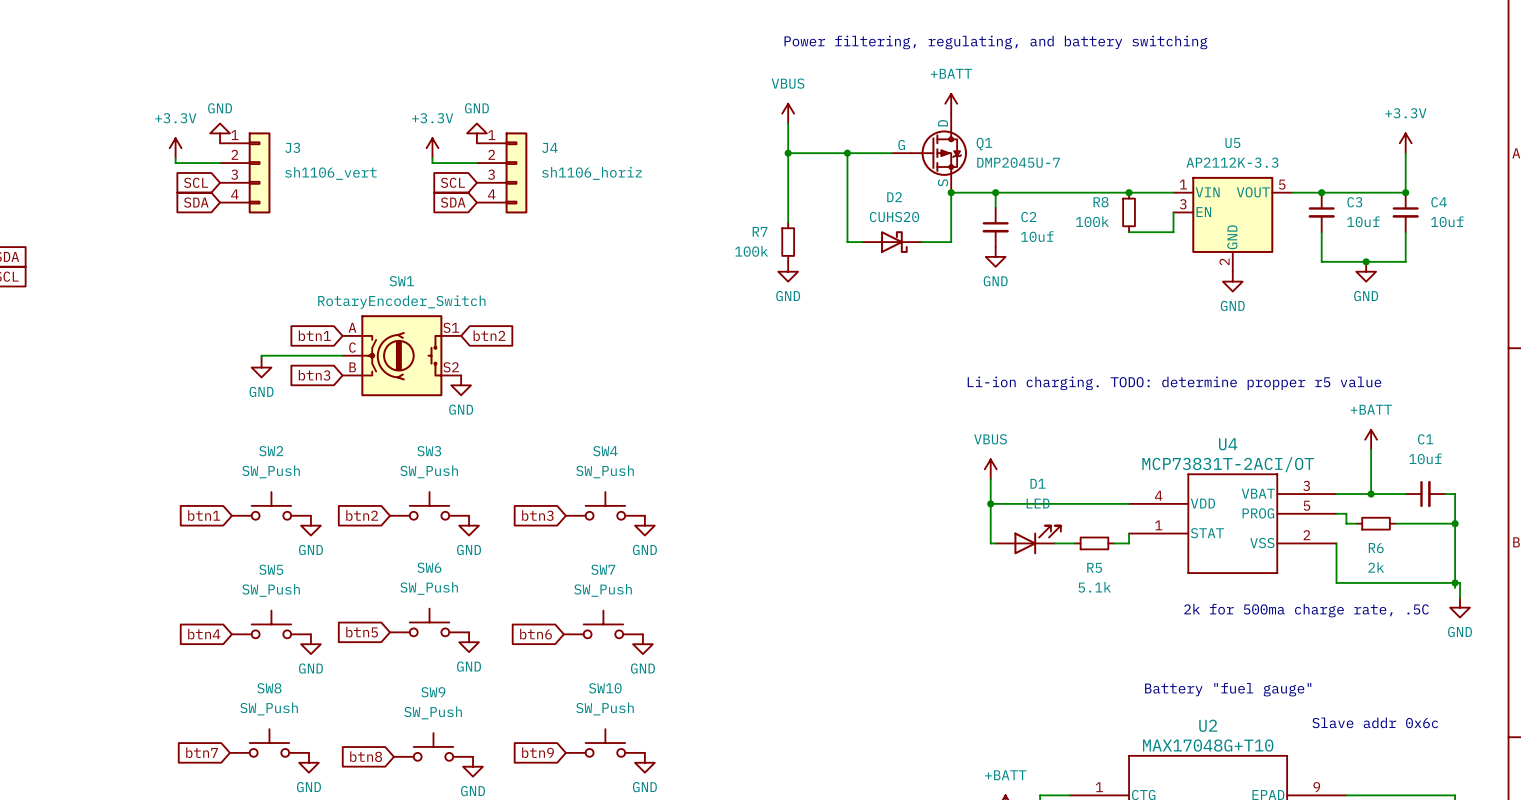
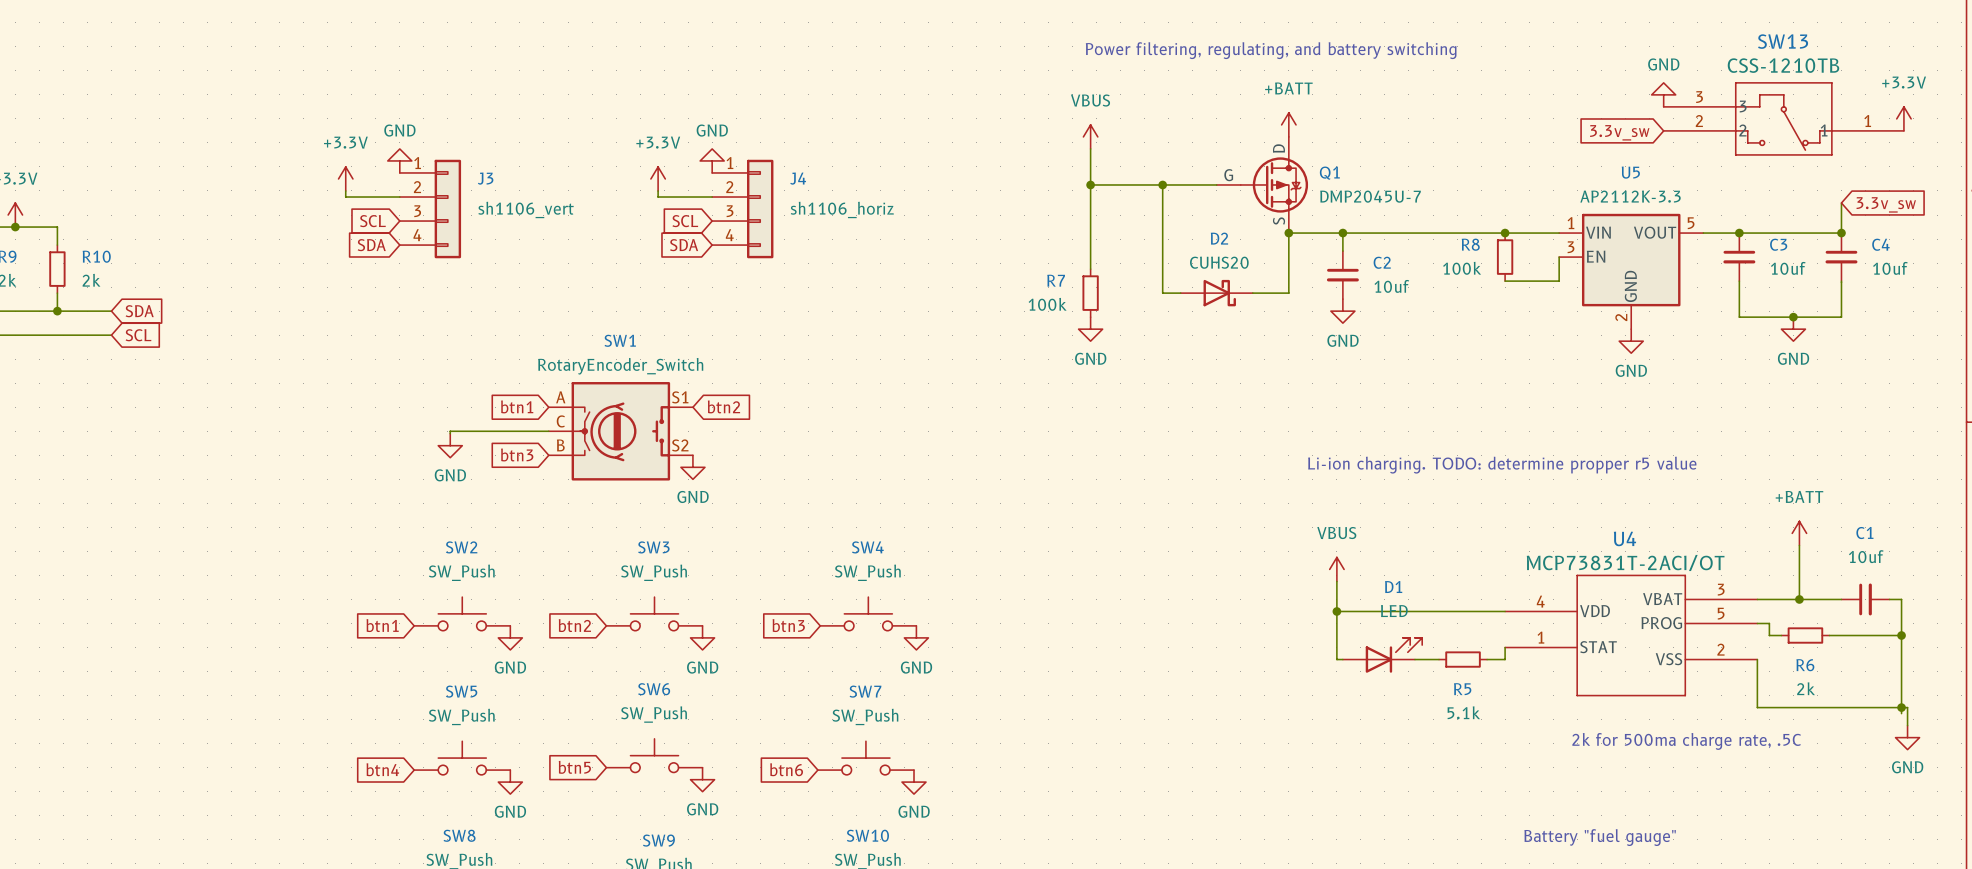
power symbol: none -> GND (1663, 94)
SW13: none -> CSS-1210TB (1783, 118)
global label: none -> 3.3v_sw (1619, 132)
power symbol position: +3.3V (1405, 143) -> +3.3V (1903, 118)
wire: (1405, 153) (1405, 167) -> none
global label: none -> 3.3v_sw (1886, 204)

